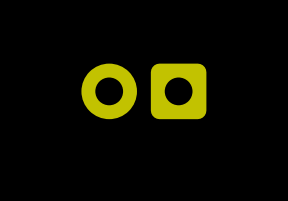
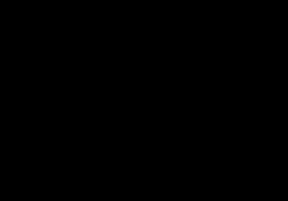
part: (143, 91) -> none

